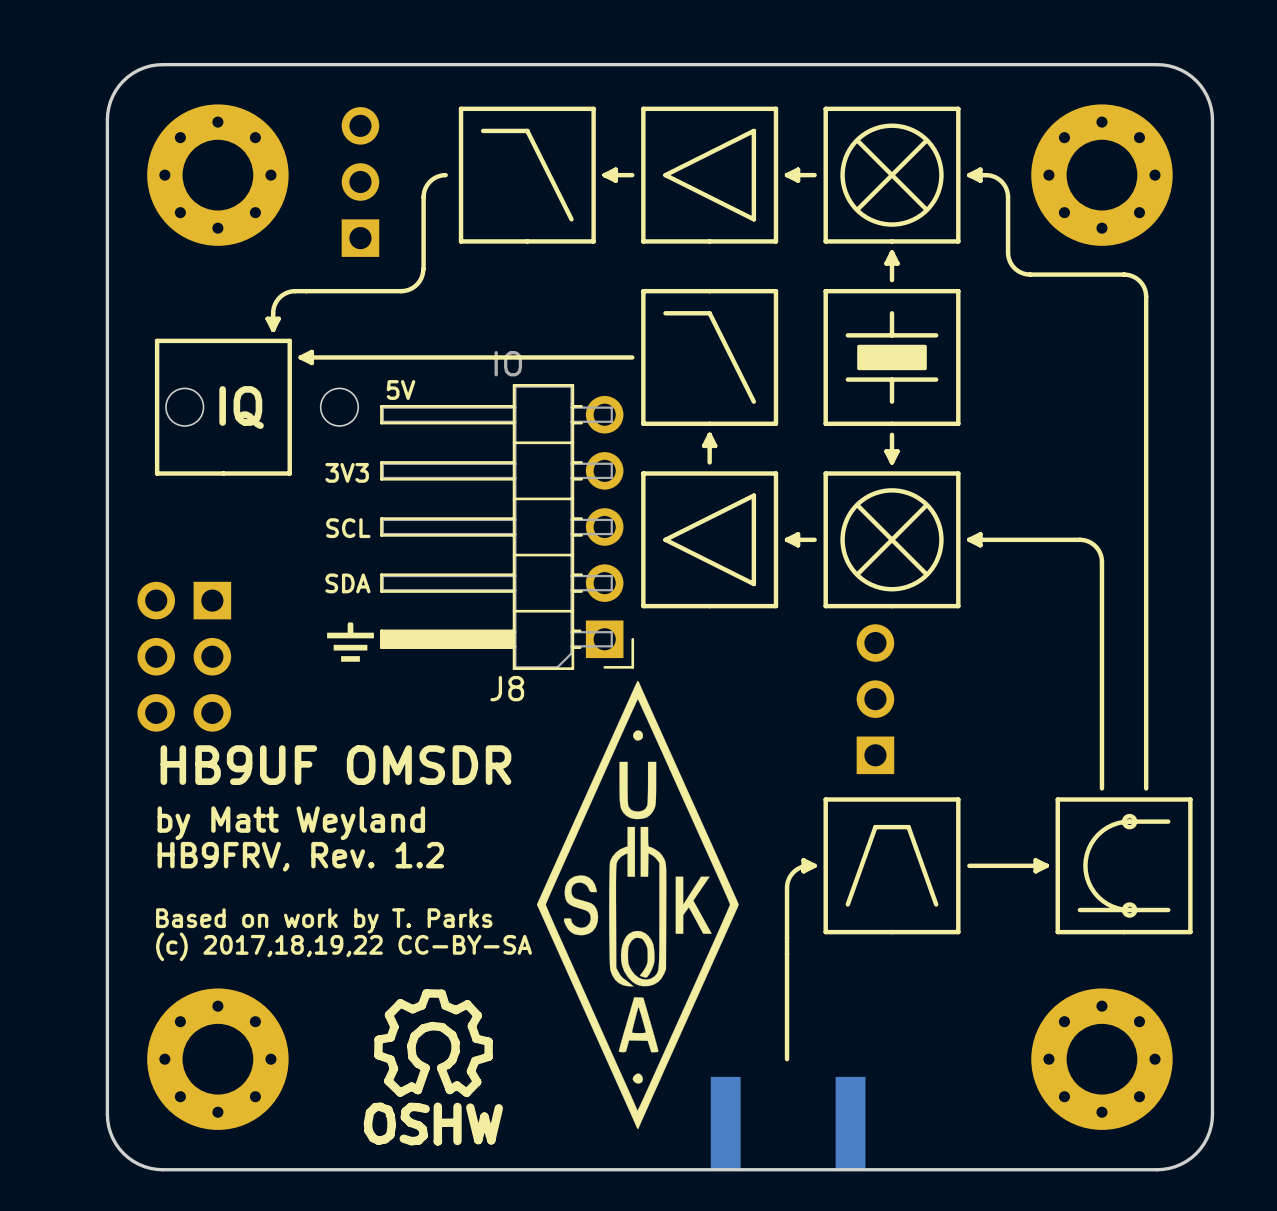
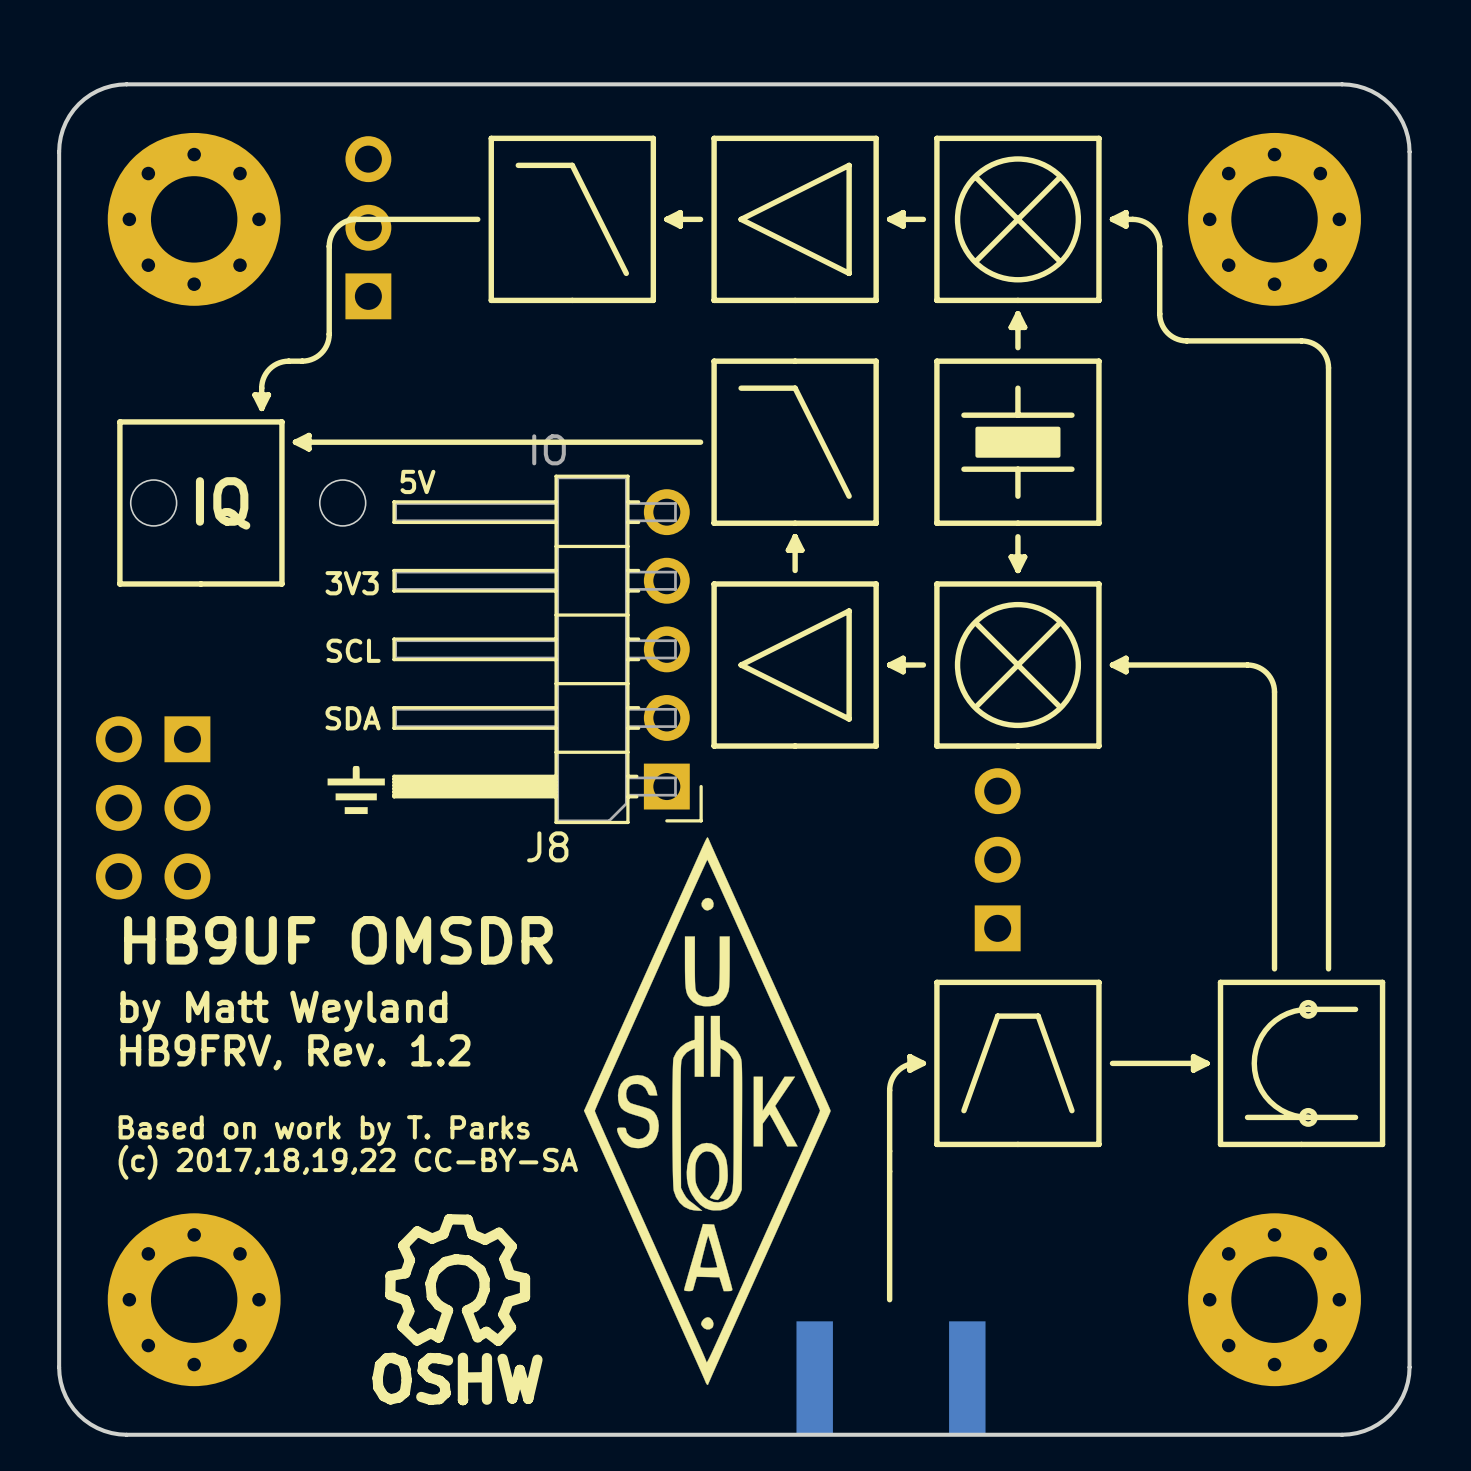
line: (445, 175) (431, 179) (424, 192) (423, 269) -> none
line: none -> (477, 219) (349, 219)
line: (423, 269) (418, 282) (406, 290) (306, 291) -> (356, 219) (347, 220) (339, 225) (333, 232) (329, 240) (327, 343) (323, 351) (316, 357) (302, 361)

